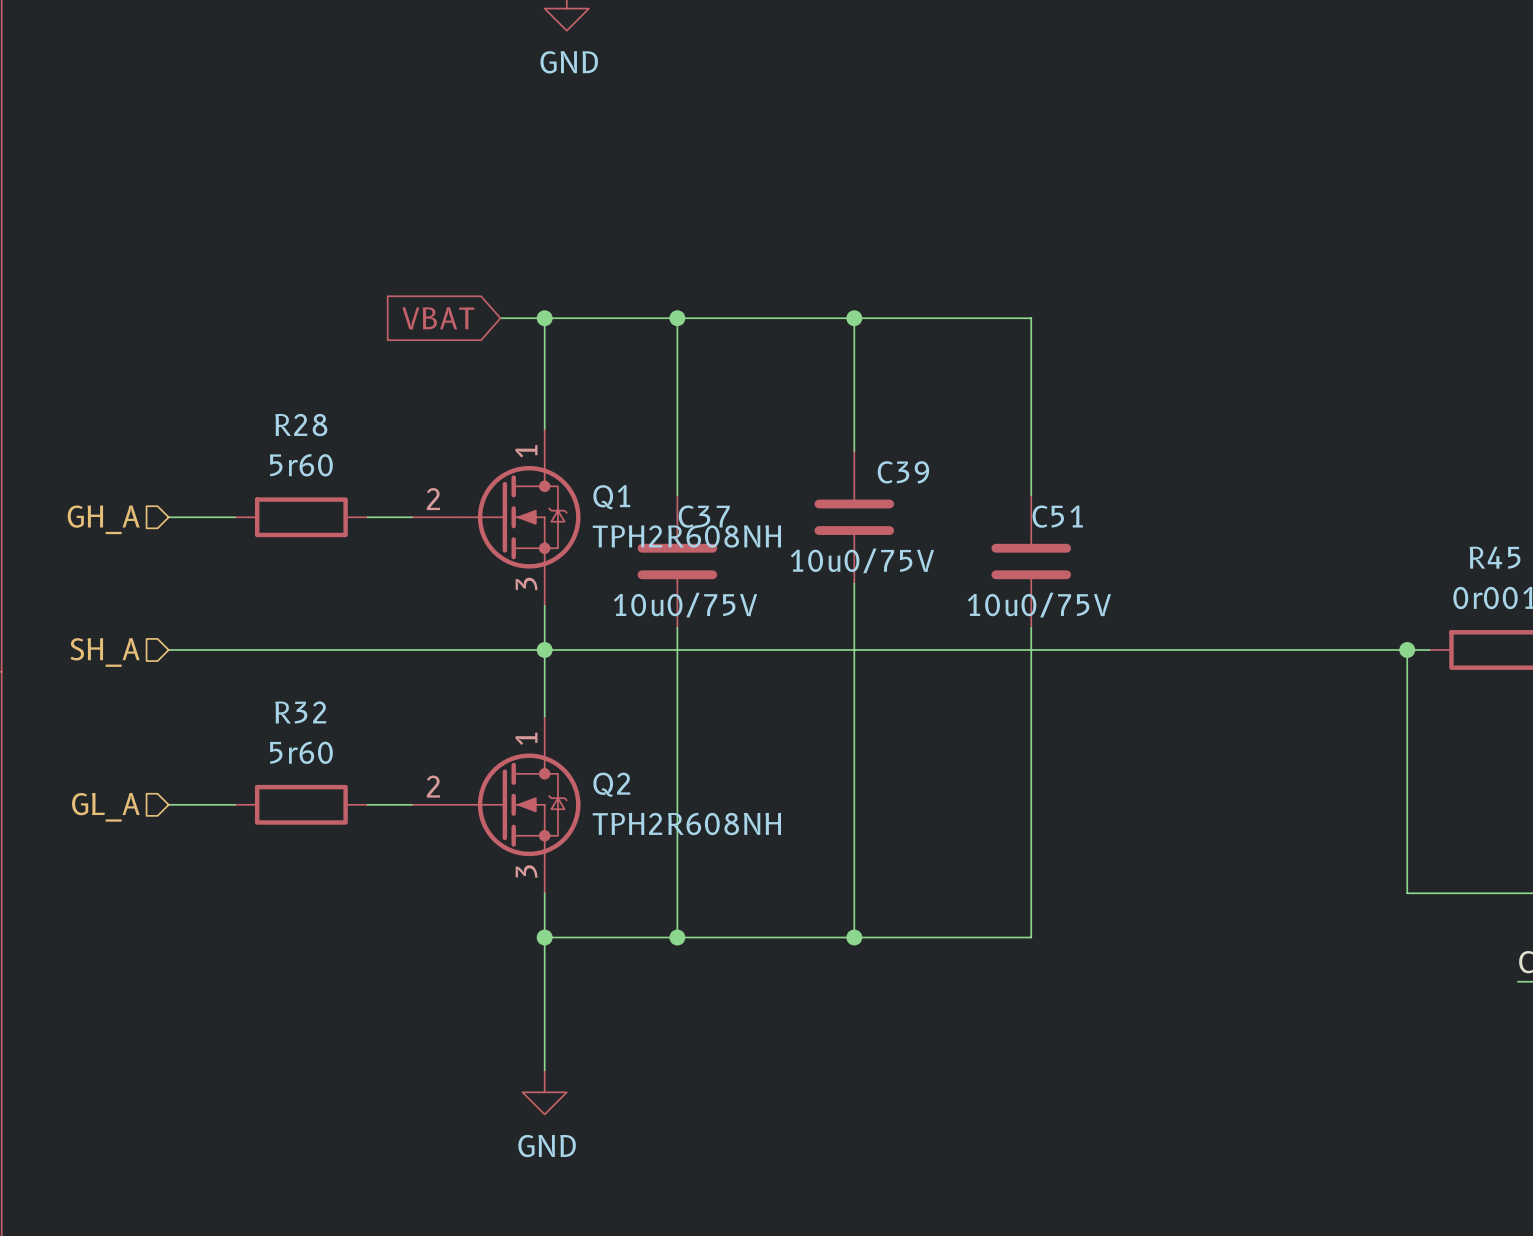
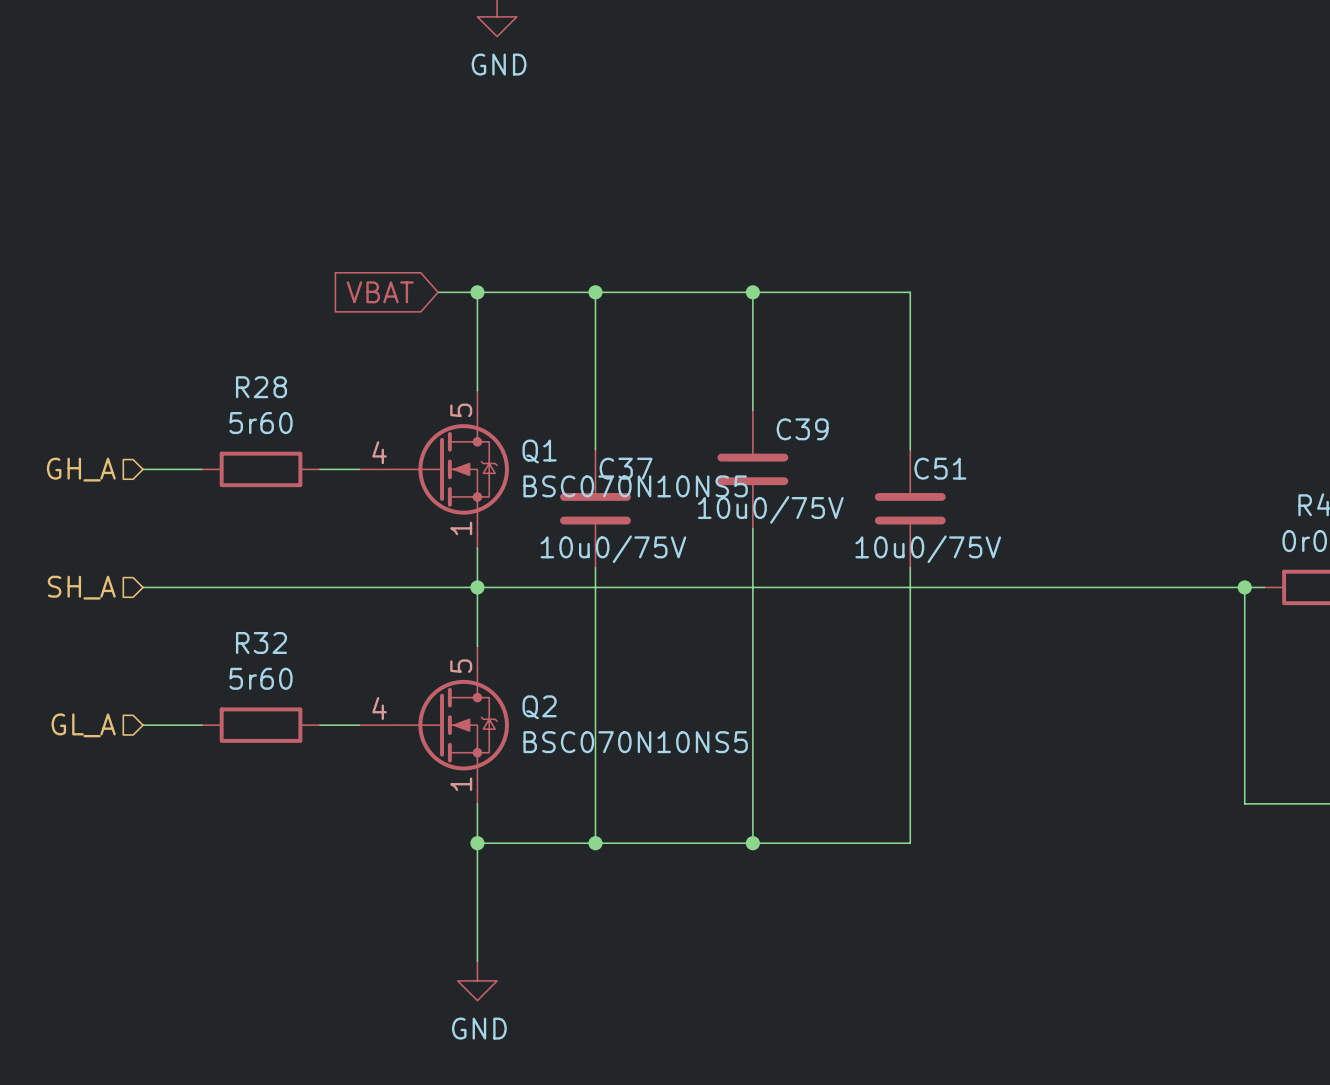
Q1 symbol: [411, 428, 581, 606] -> [359, 390, 509, 549]
Q1 value: TPH2R608NH (686, 536) -> BSC070N10NS5 (635, 486)
Q2 symbol: [411, 716, 581, 894] -> [359, 646, 509, 804]
Q2 value: TPH2R608NH (686, 824) -> BSC070N10NS5 (635, 742)

